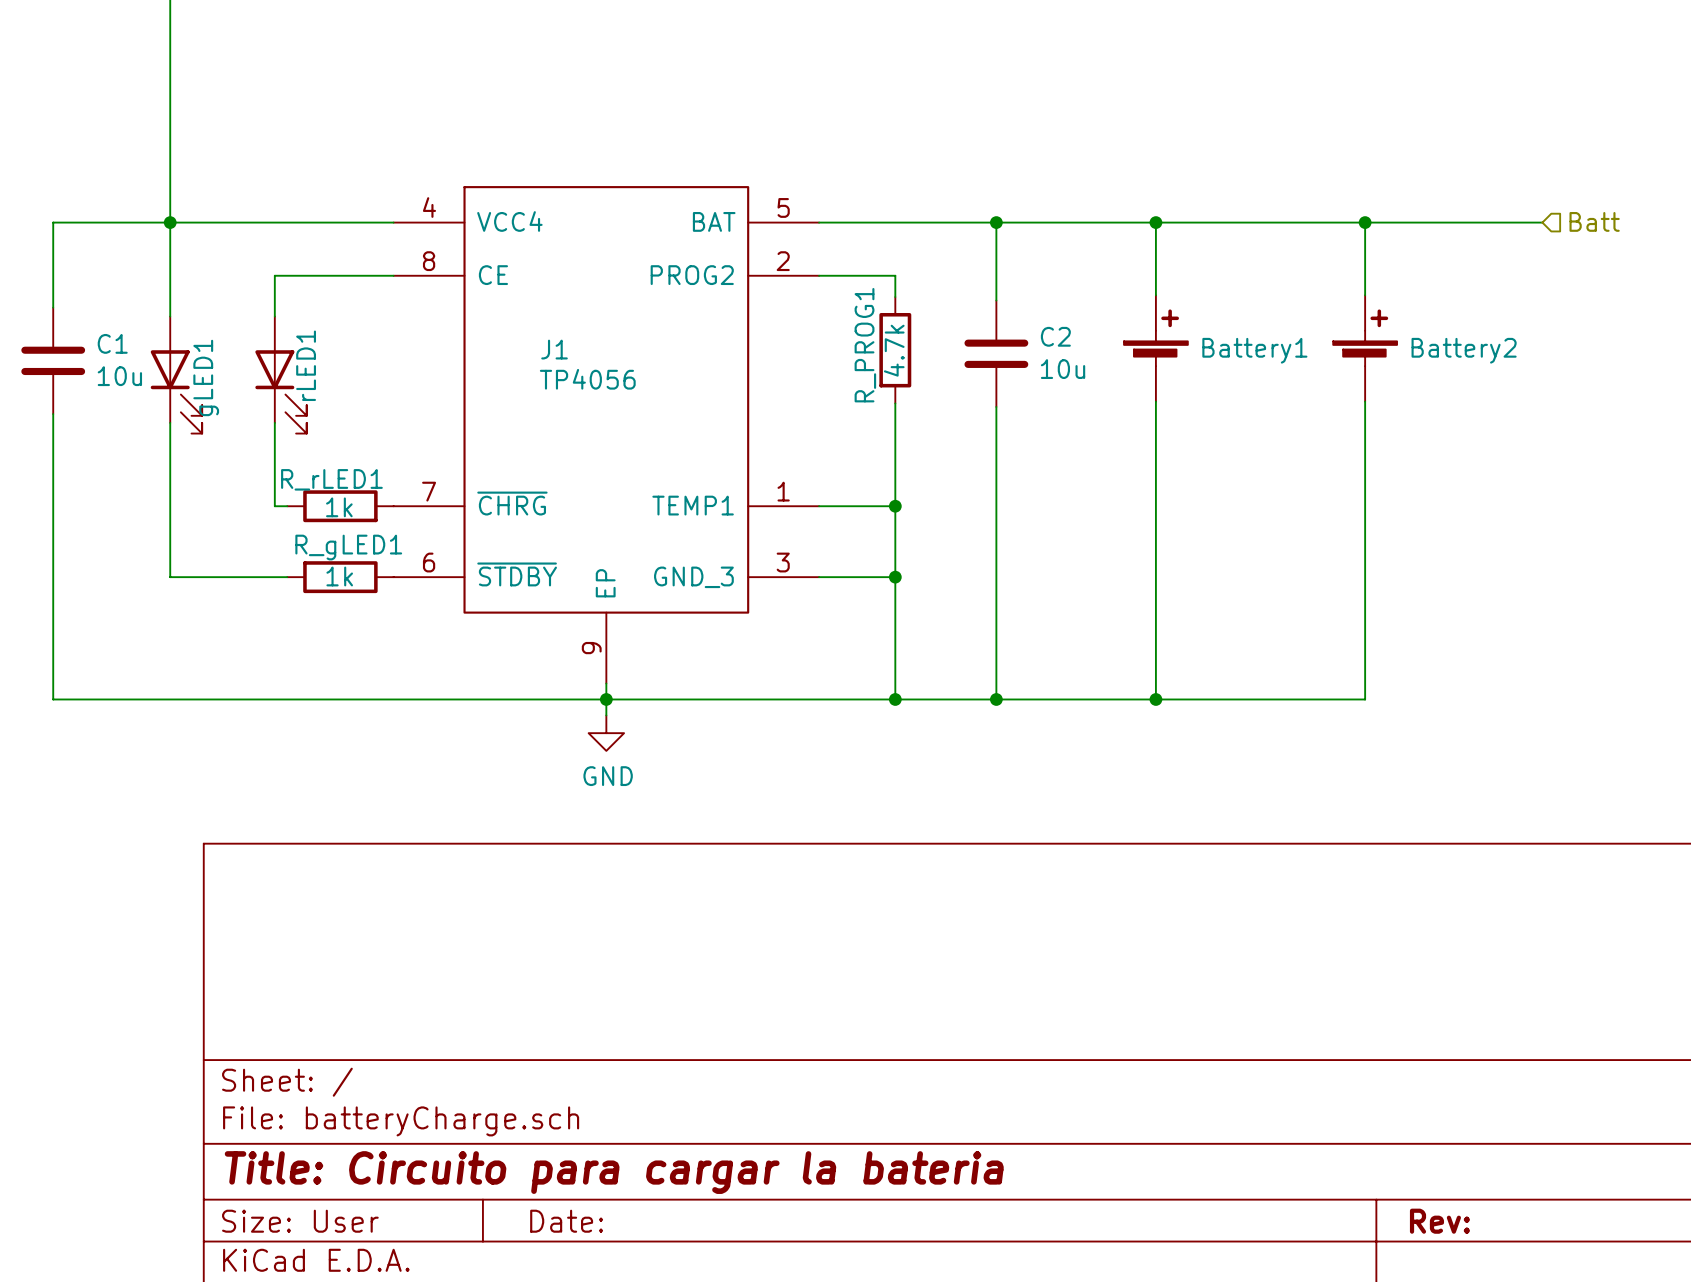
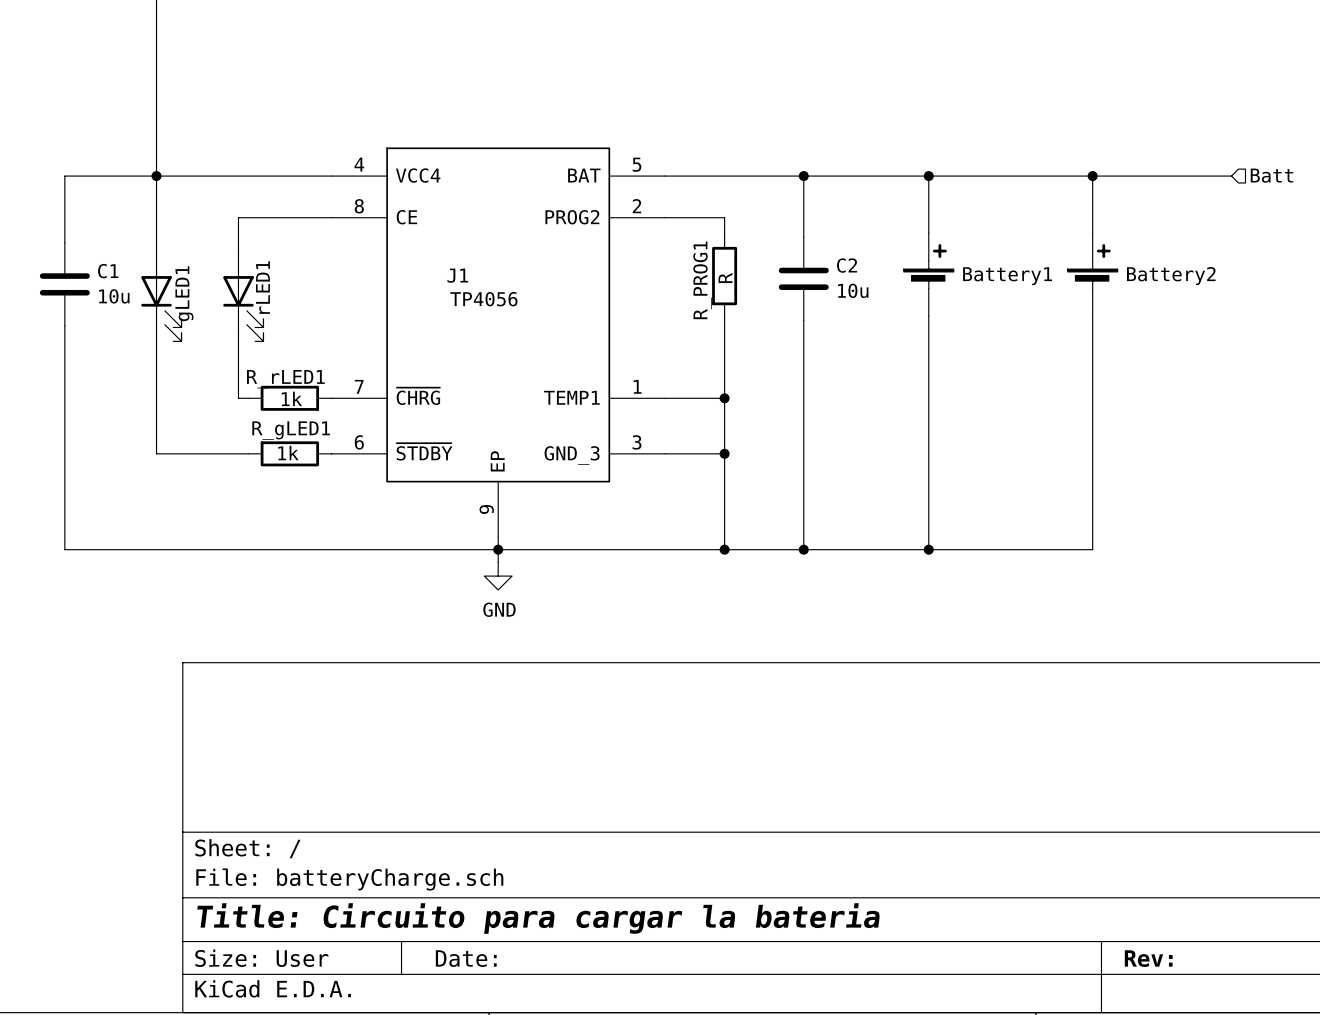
R_PROG1 value: 4.7k (894, 350) -> R (725, 278)

